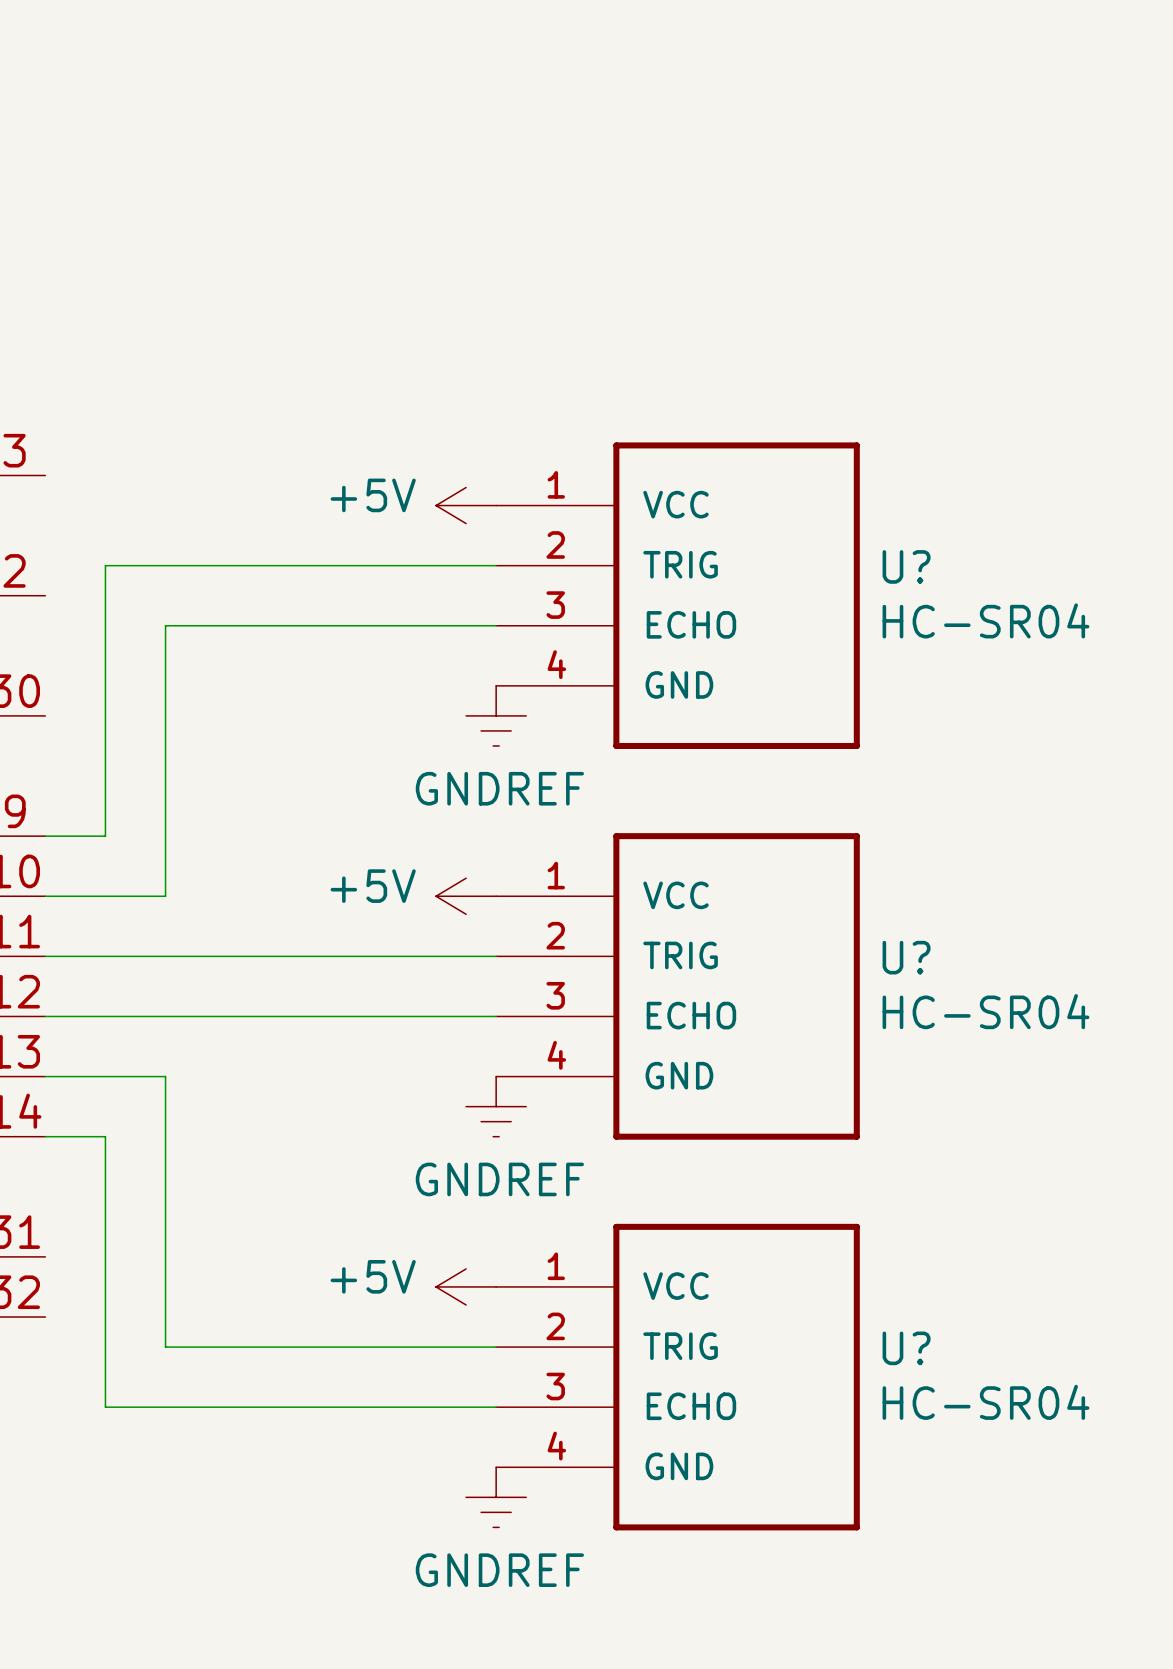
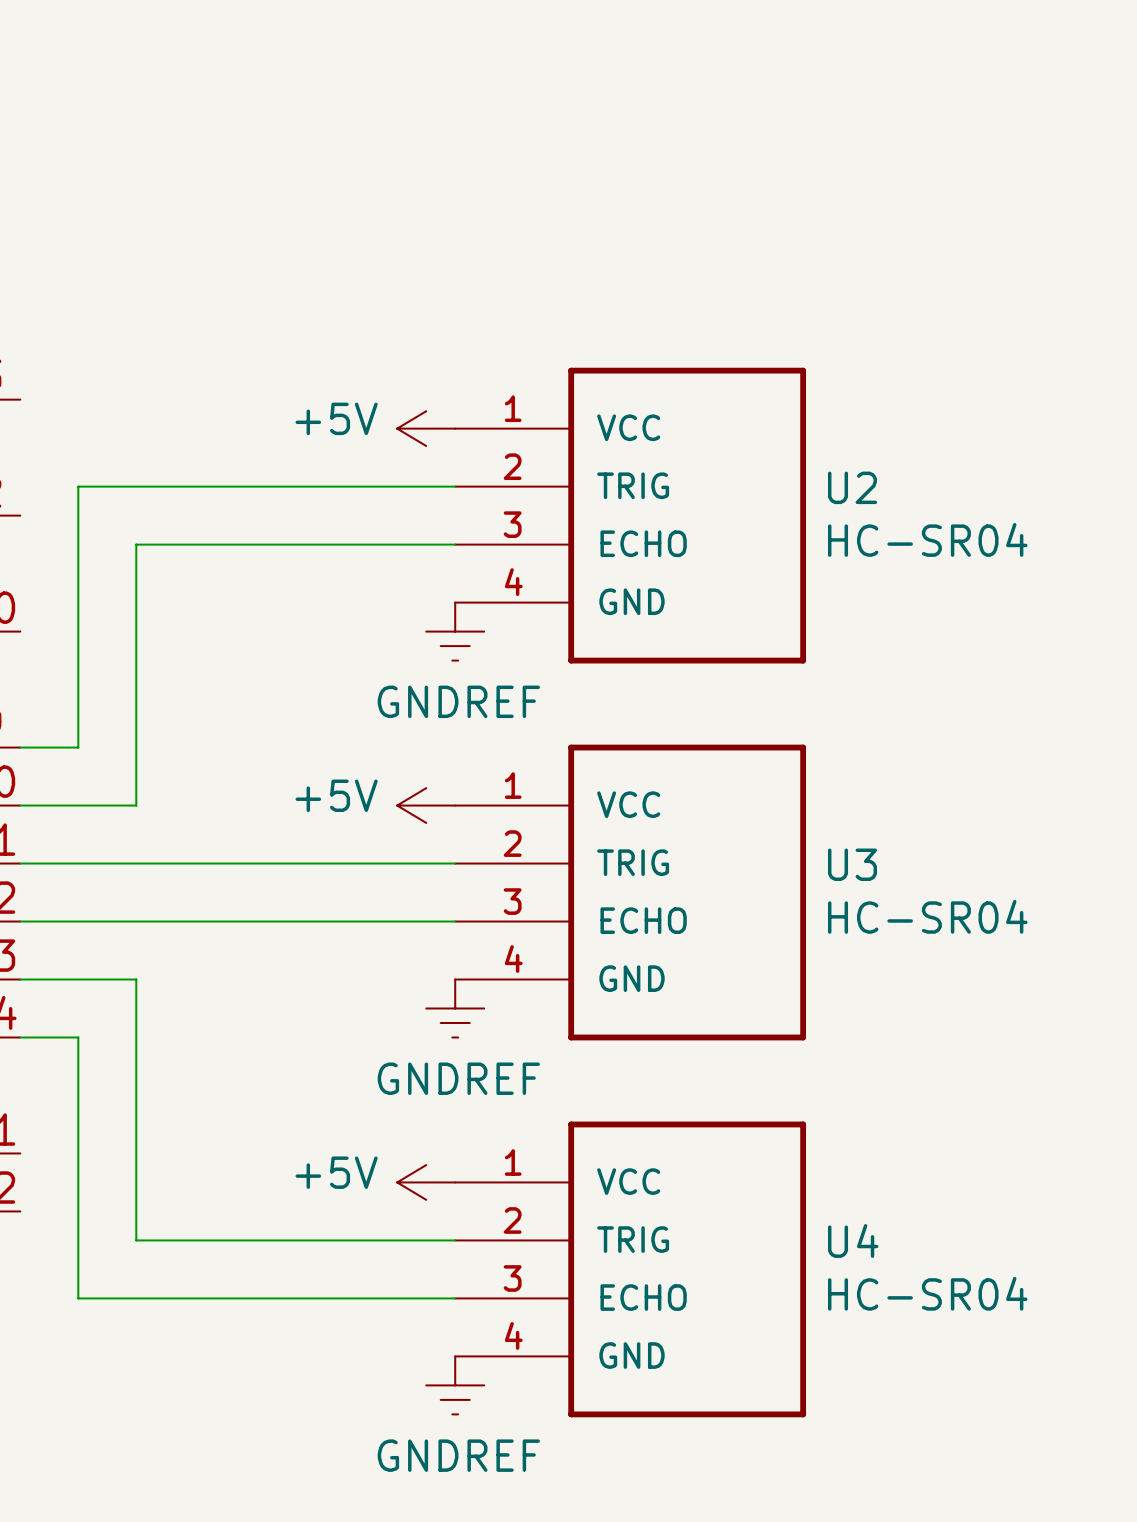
U? name: U? (906, 566) -> U2 (852, 487)
U? name: U? (906, 957) -> U3 (852, 864)
U? name: U? (906, 1348) -> U4 (853, 1240)

